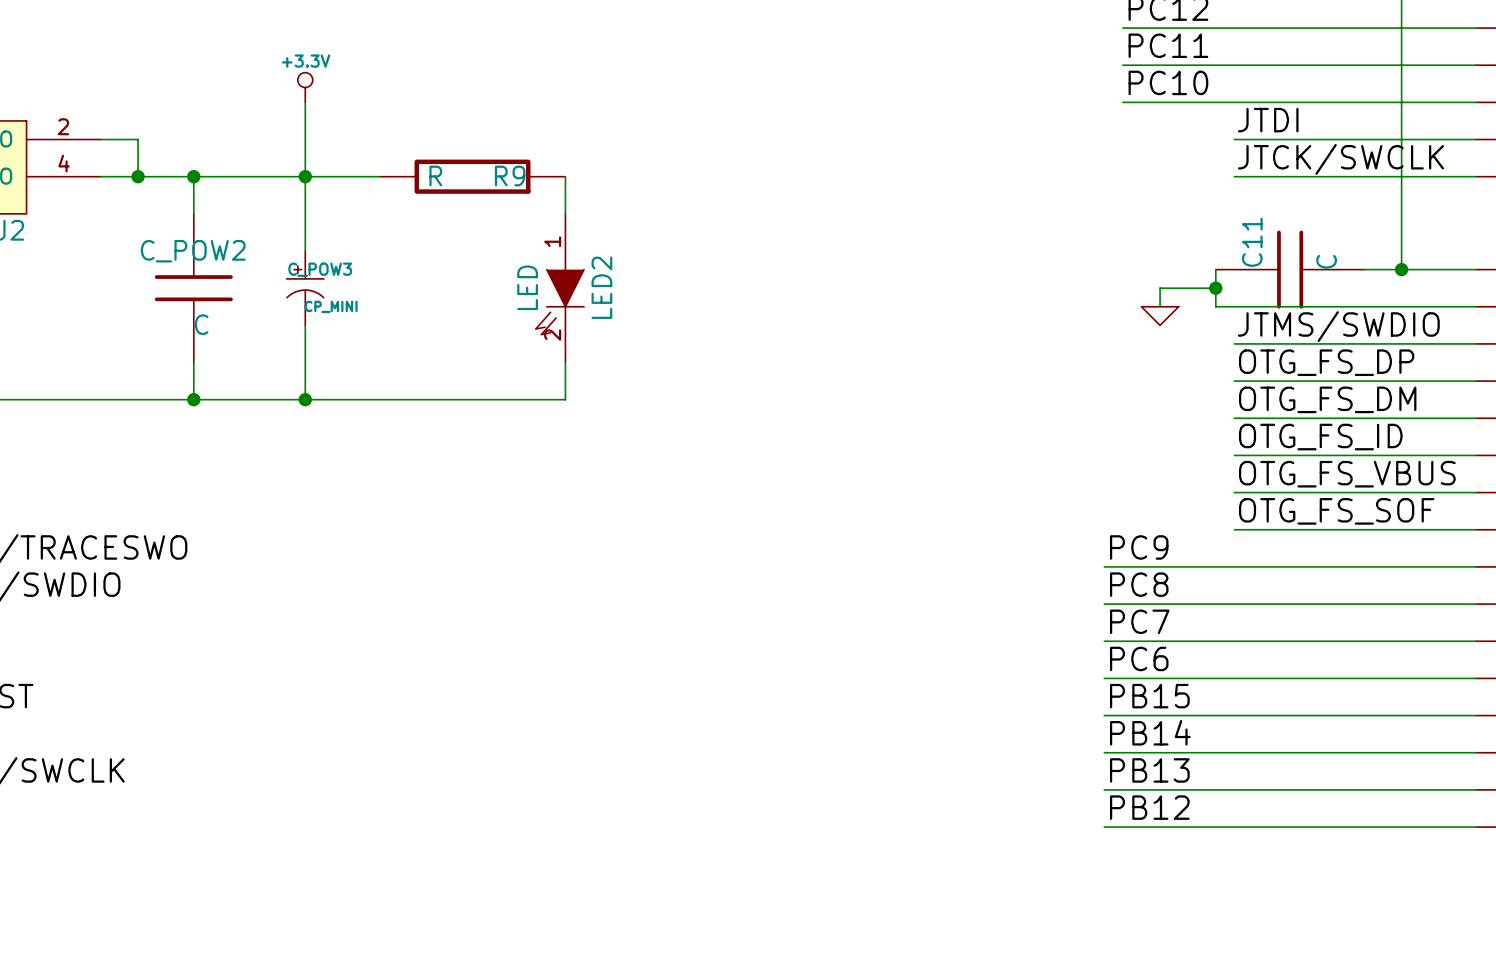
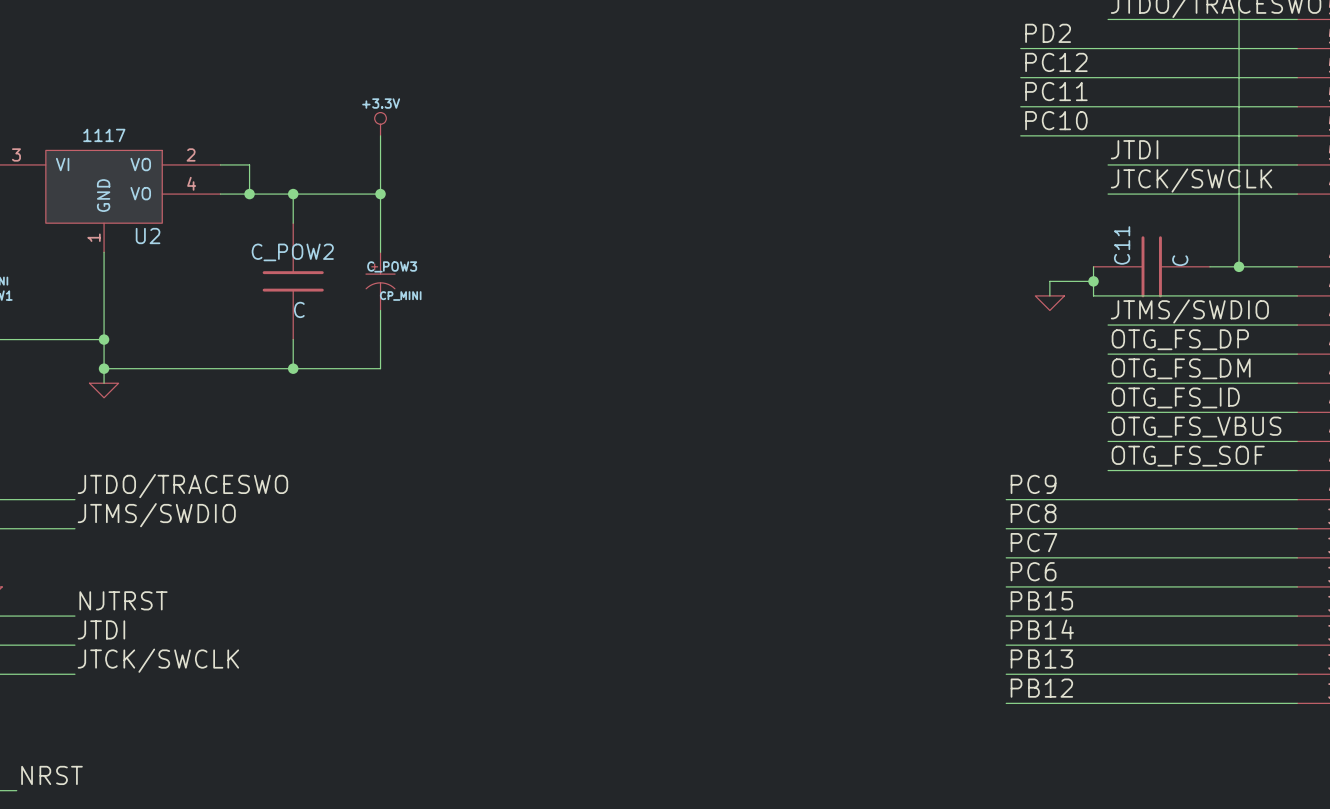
wire: (305, 176) (379, 176) -> none
R9: R (472, 176) -> none
wire: (565, 176) (565, 213) -> none
LED2: LED (559, 288) -> none
wire: (565, 362) (565, 399) (305, 399) -> none
junction: (305, 399) -> none

